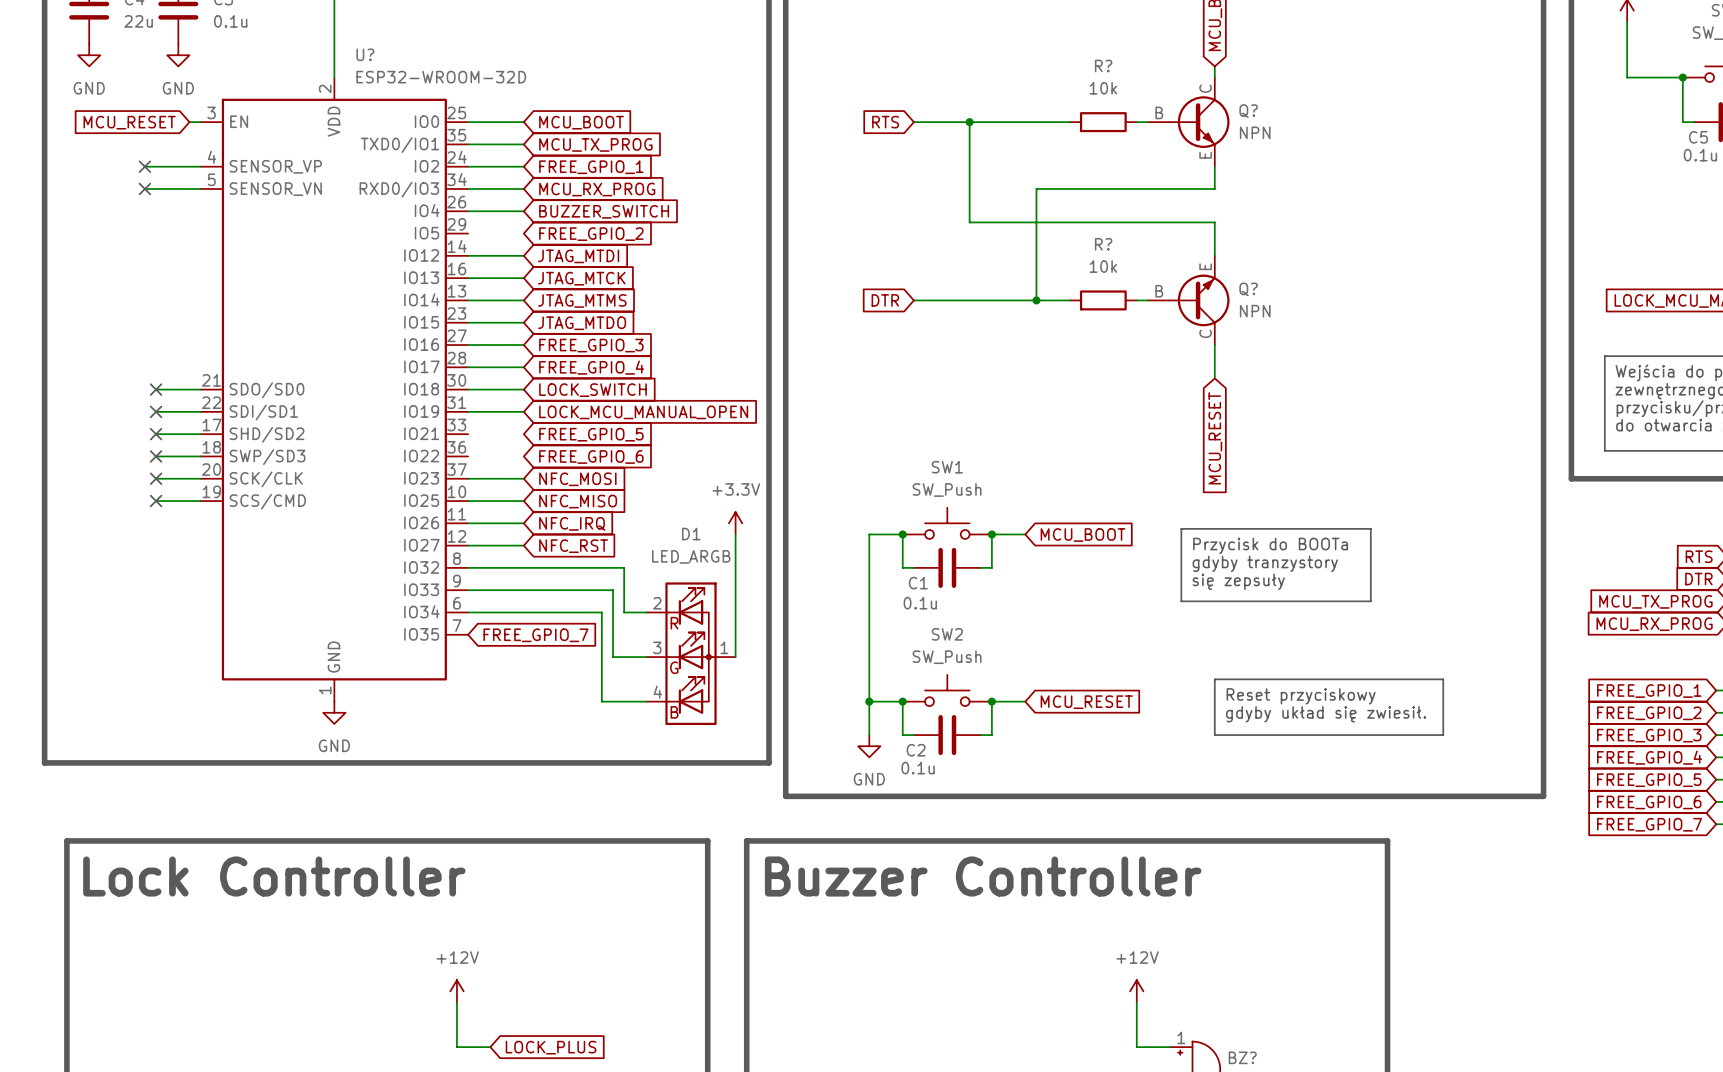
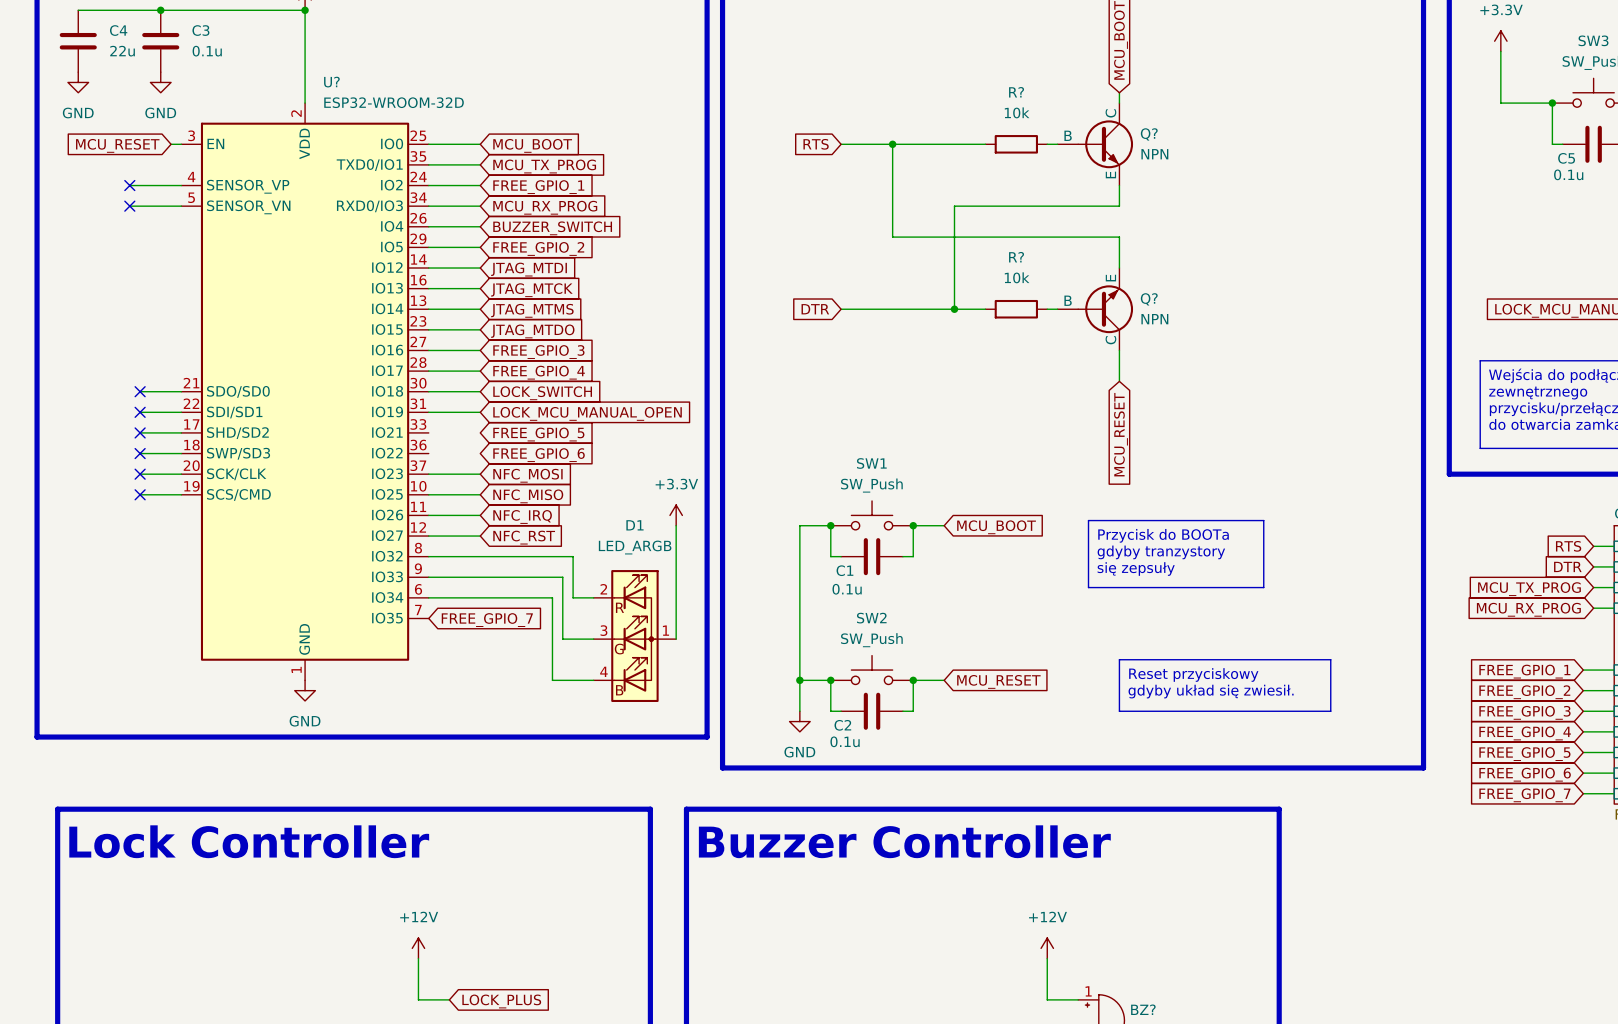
wire: none -> (428, 247) (480, 247)

